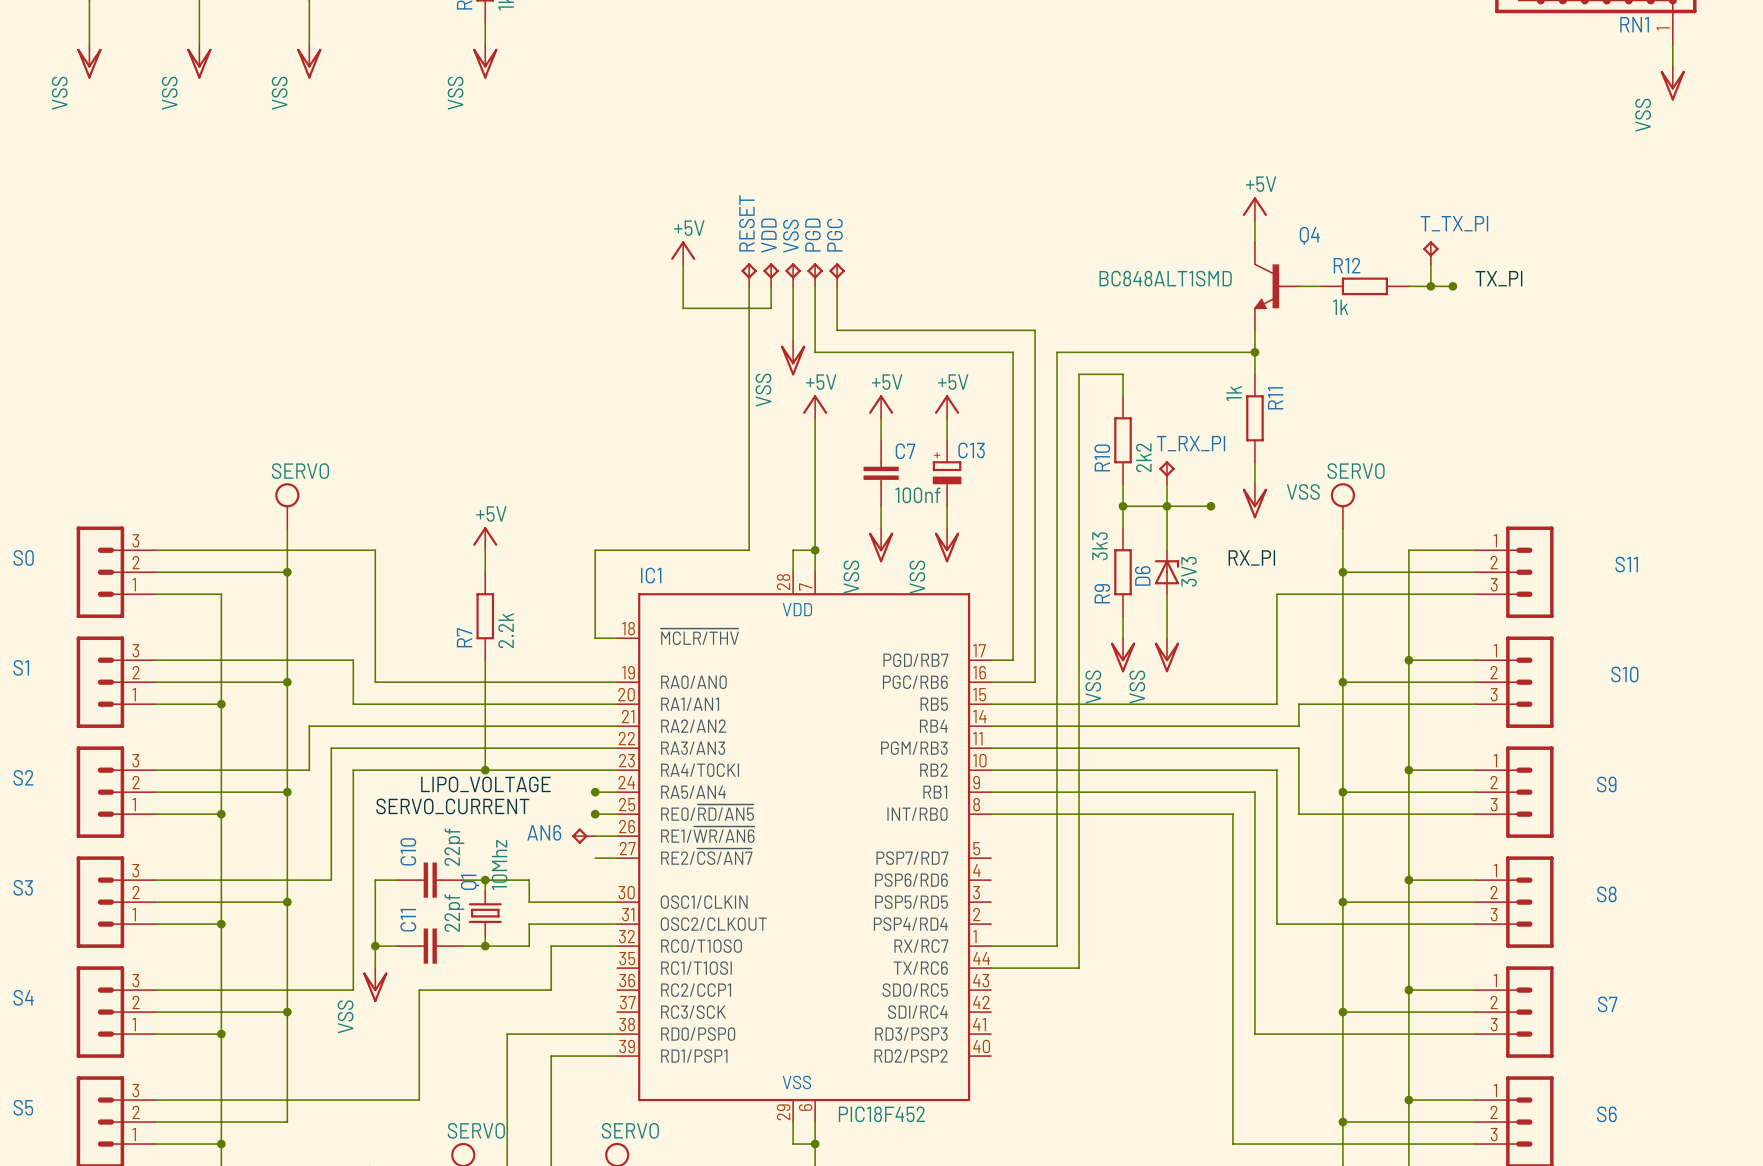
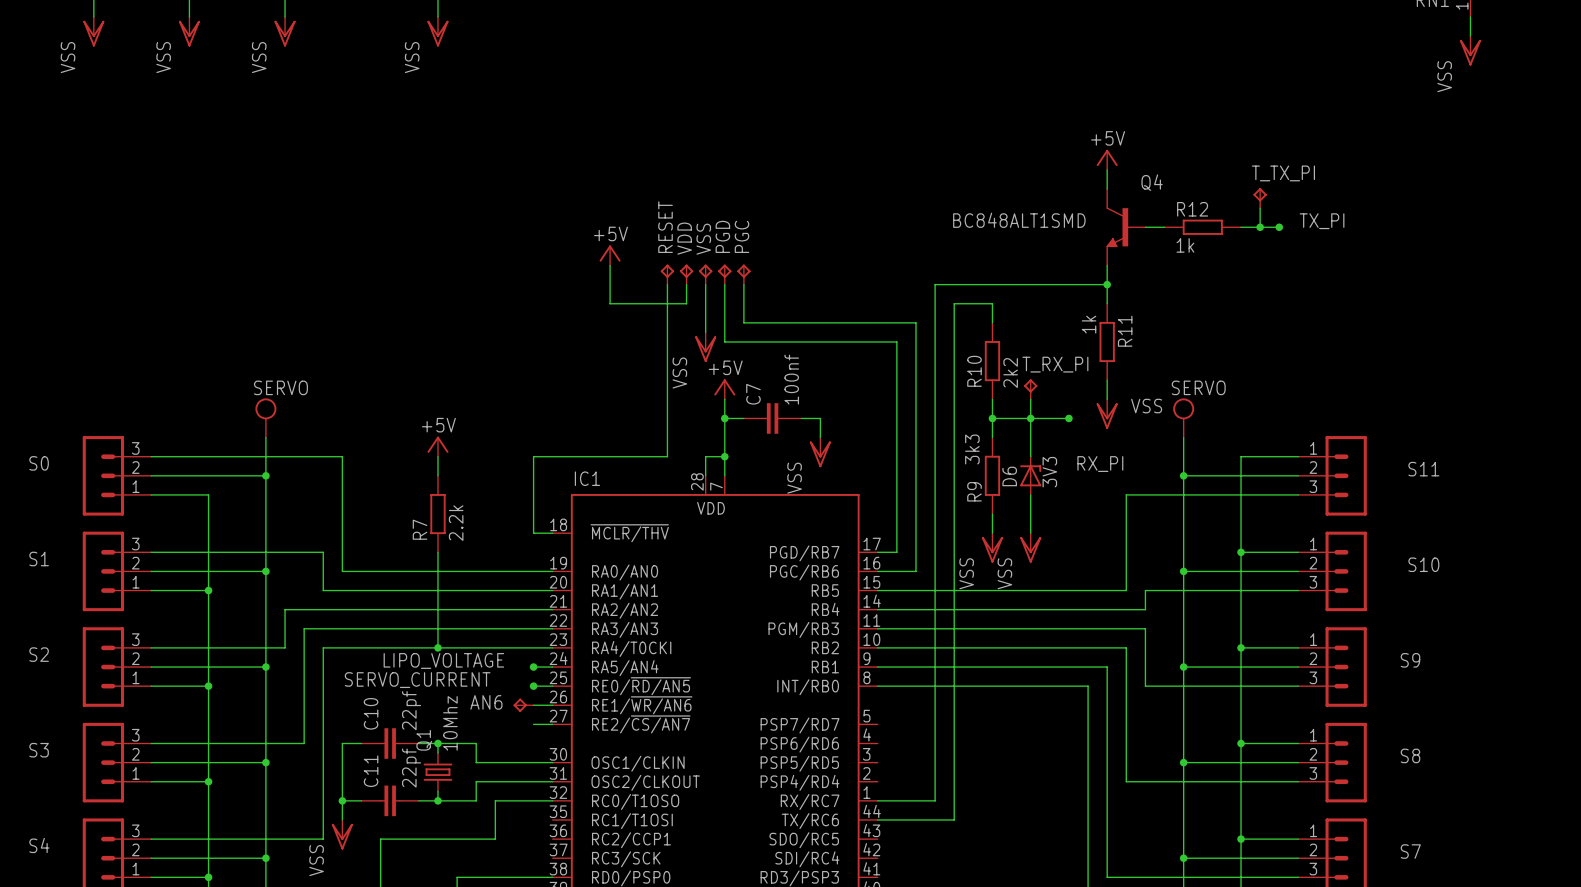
power symbol position: +5V (683, 252) -> +5V (610, 255)
wire: (683, 264) (683, 308) (771, 308) (771, 286) -> (610, 265) (610, 303) (686, 303) (686, 284)
RESET position: (749, 274) -> (667, 274)
VDD position: (771, 274) -> (686, 274)
VSS position: (793, 274) -> (705, 274)
PGD position: (815, 274) -> (724, 274)
PGC position: (837, 274) -> (743, 274)
wire: (749, 286) (749, 352) -> none
wire: (793, 286) (793, 341) -> (705, 284) (705, 332)
wire: (815, 286) (815, 352) (1013, 352) (1013, 418) -> (724, 284) (724, 341) (896, 341)
wire: (837, 286) (837, 330) (1035, 330) (1035, 396) -> (743, 284) (743, 322) (915, 322)
power symbol position: VSS (793, 358) -> VSS (705, 347)
power symbol: +5V (815, 406) -> none
power symbol: +5V (881, 406) -> none
power symbol: +5V (947, 406) -> none
wire: (815, 418) (815, 484) -> none
wire: (881, 418) (881, 440) -> none
wire: (947, 418) (947, 440) -> none
C7 name position: C7 (905, 451) -> C7 (753, 394)
power symbol: none -> +5V (724, 389)
C7 rotation: 0° (881, 473) -> 90° clockwise (772, 418)
C13: (947, 473) -> none
C7 value position: 100nf (917, 495) -> 100nf (791, 379)
wire: none -> (724, 418) (743, 418)
junction: none -> (724, 418)
wire: (881, 506) (881, 528) -> none
wire: none -> (801, 418) (820, 418) (820, 437)
wire: (947, 506) (947, 528) -> none
power symbol: VSS (881, 545) -> none
power symbol: none -> VSS (820, 452)
power symbol: VSS (947, 545) -> none

